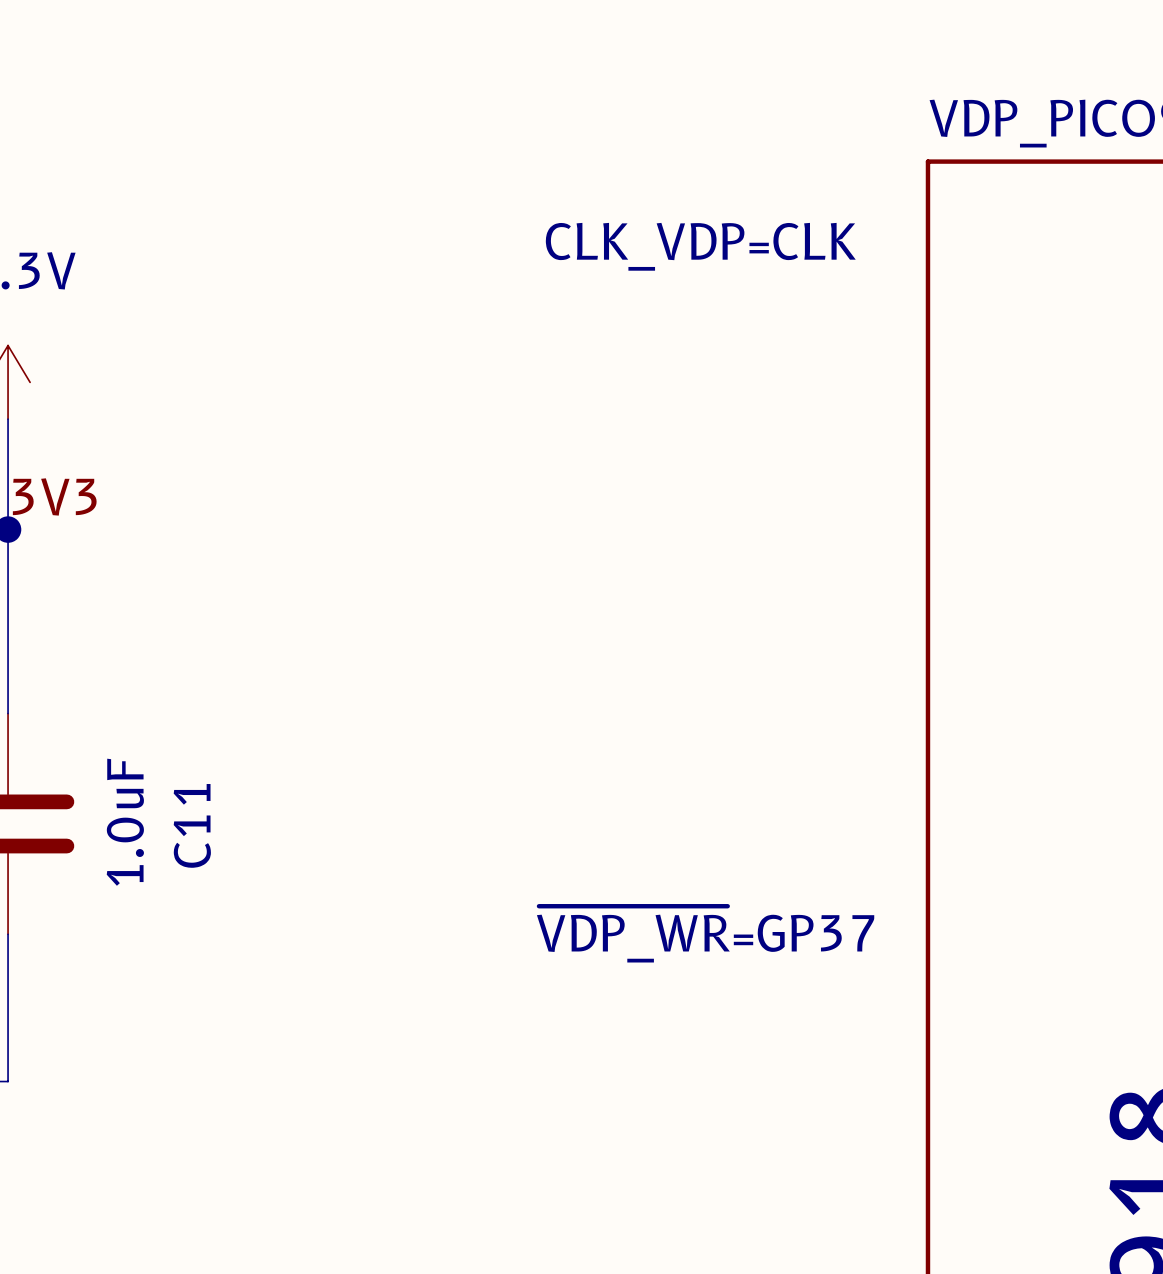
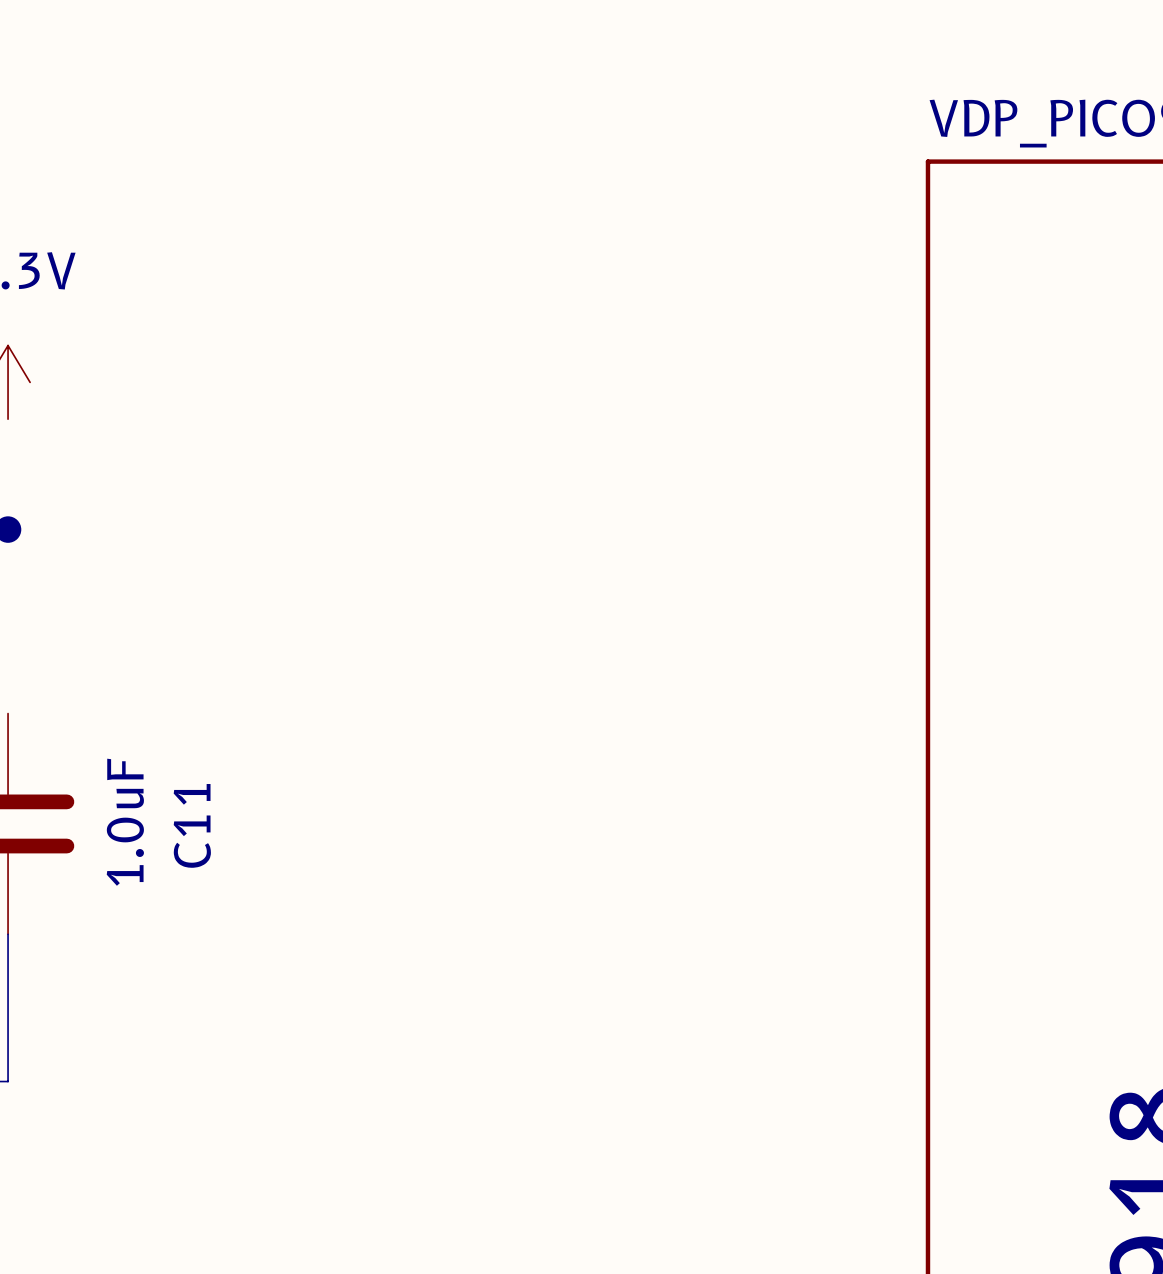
text: CLK_VDP=CLK (700, 246) -> none
wire: (8, 419) (8, 713) -> none
label: 3V3 (54, 496) -> none
text: ~{VDP_WR}=GP37 (705, 934) -> none

